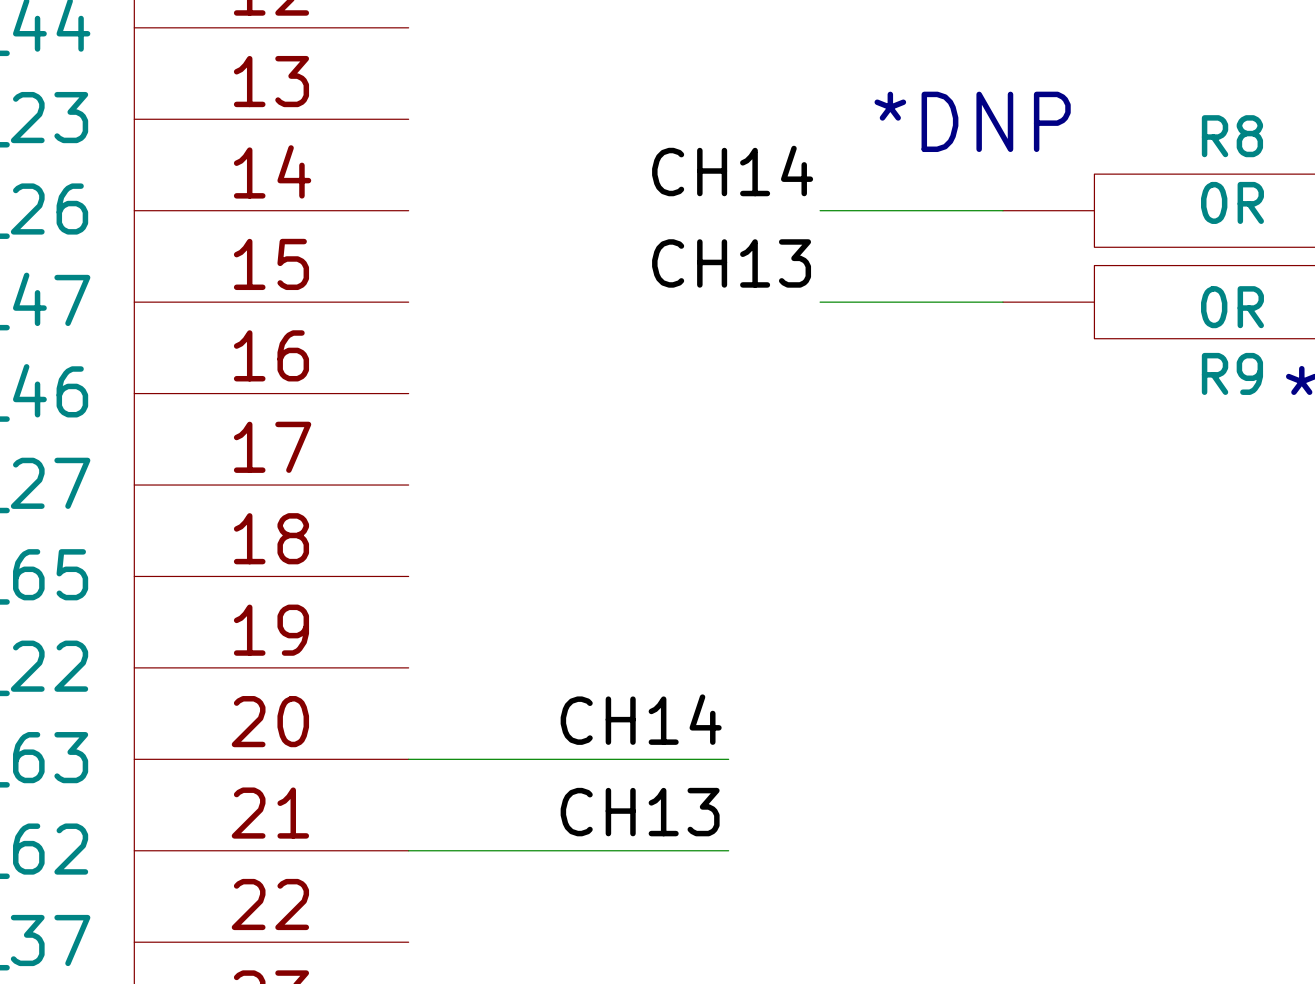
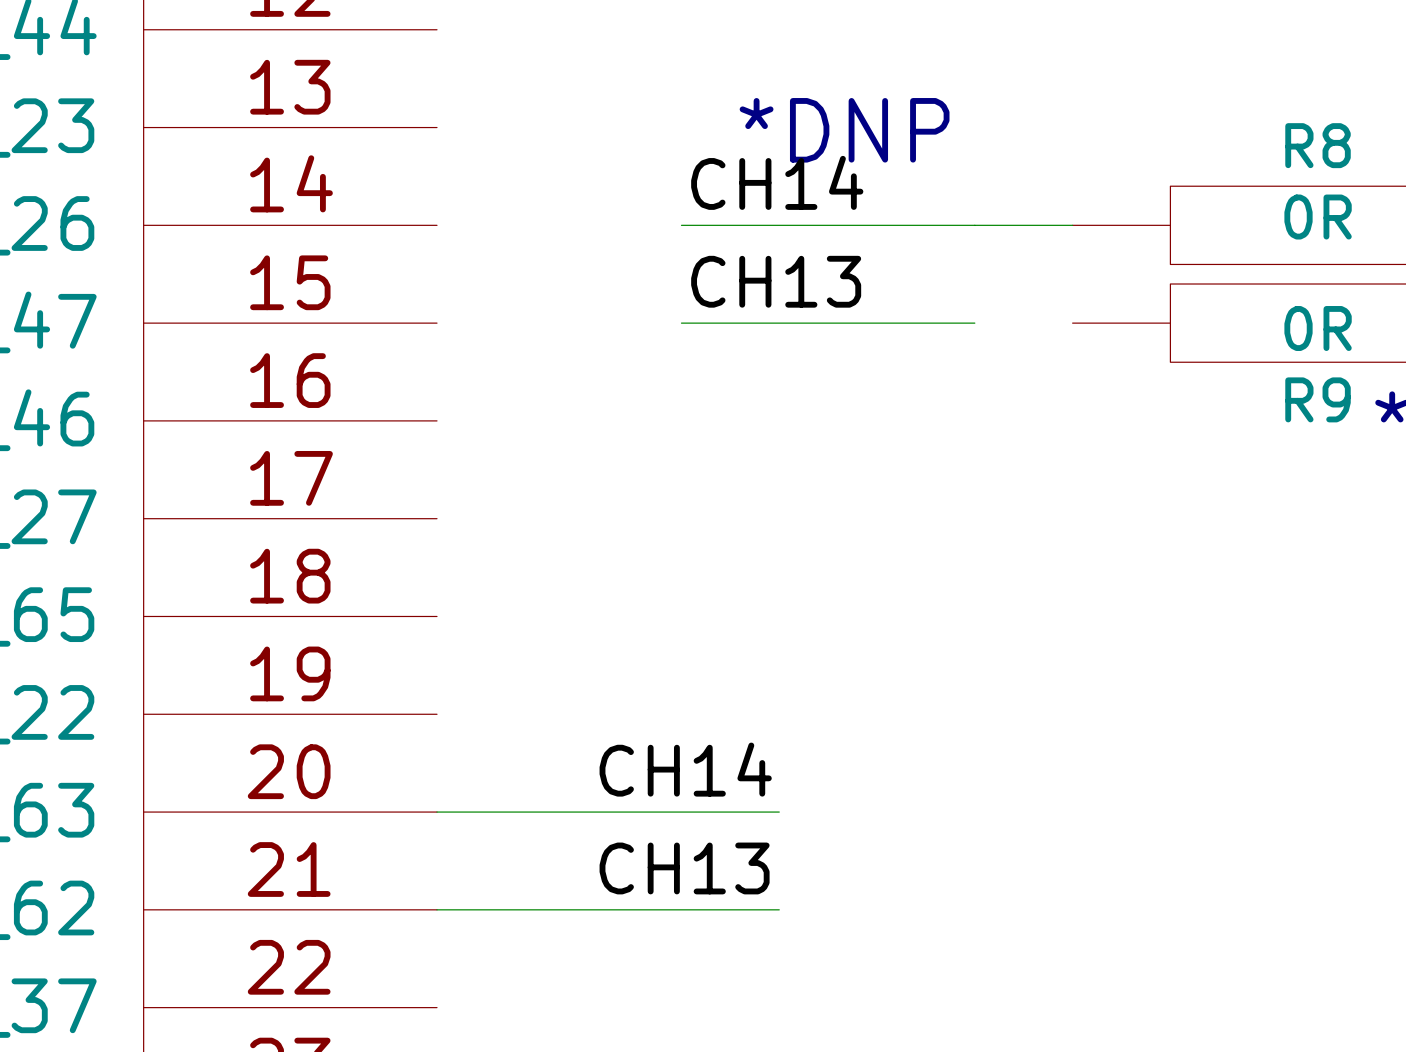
text position: *DNP (972, 121) -> *DNP (844, 130)
label position: CH14 (732, 171) -> CH14 (777, 182)
wire: none -> (681, 225) (877, 225)
label position: CH13 (731, 263) -> CH13 (776, 281)
wire: none -> (681, 323) (877, 323)
wire: (911, 302) (1002, 302) -> none

